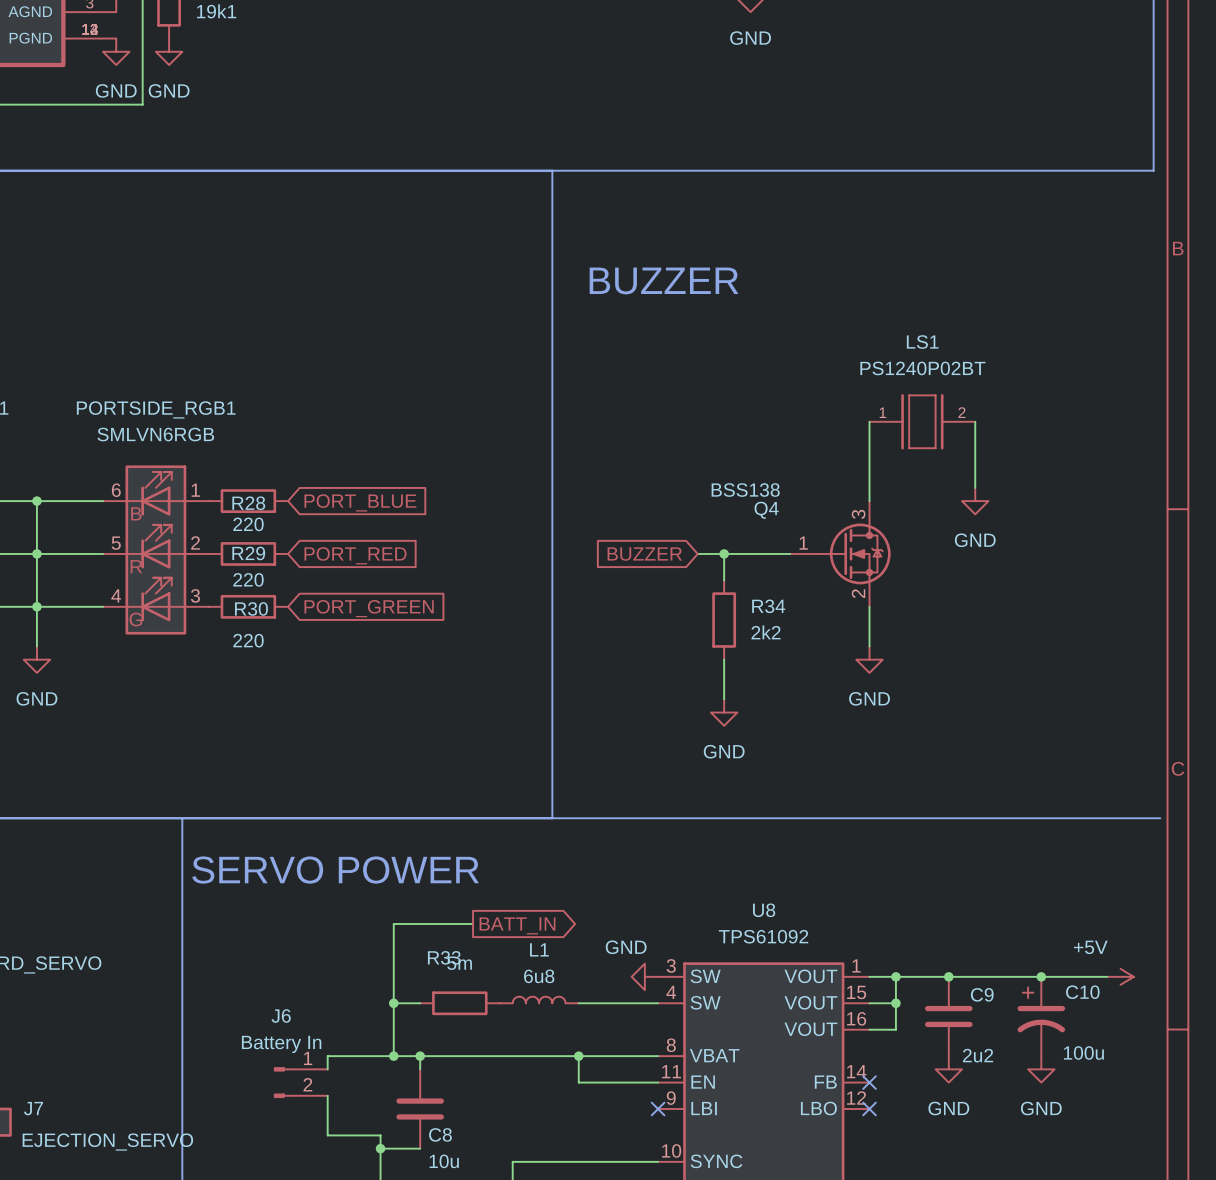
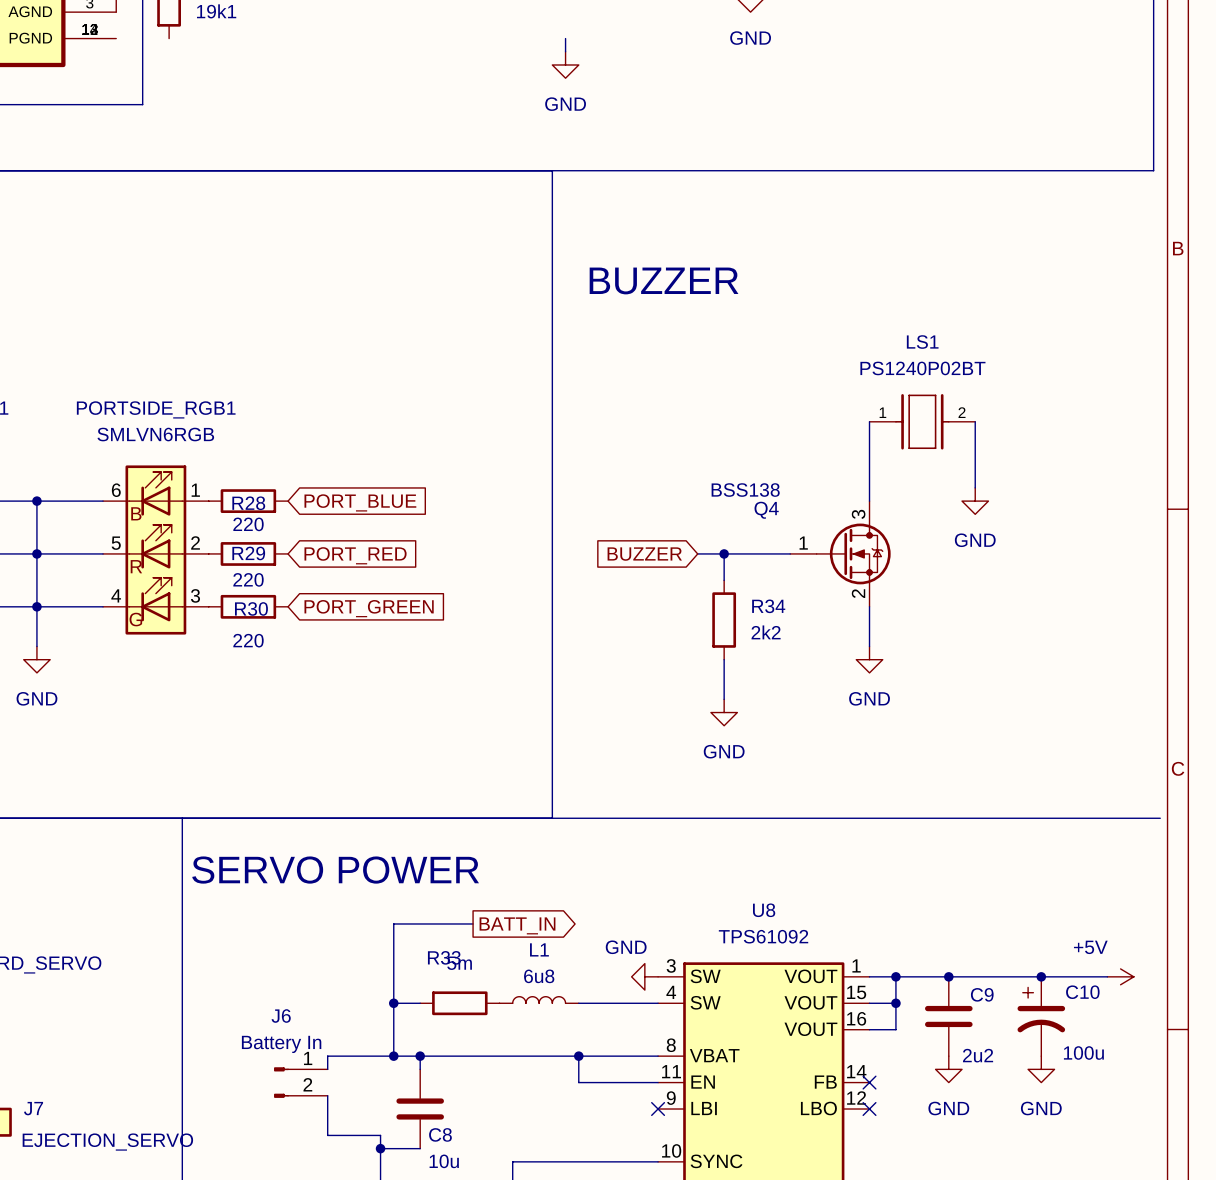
wire: none -> (565, 38) (565, 51)
power symbol: GND (116, 51) -> none
power symbol: GND (169, 51) -> none
power symbol: none -> GND (565, 64)

